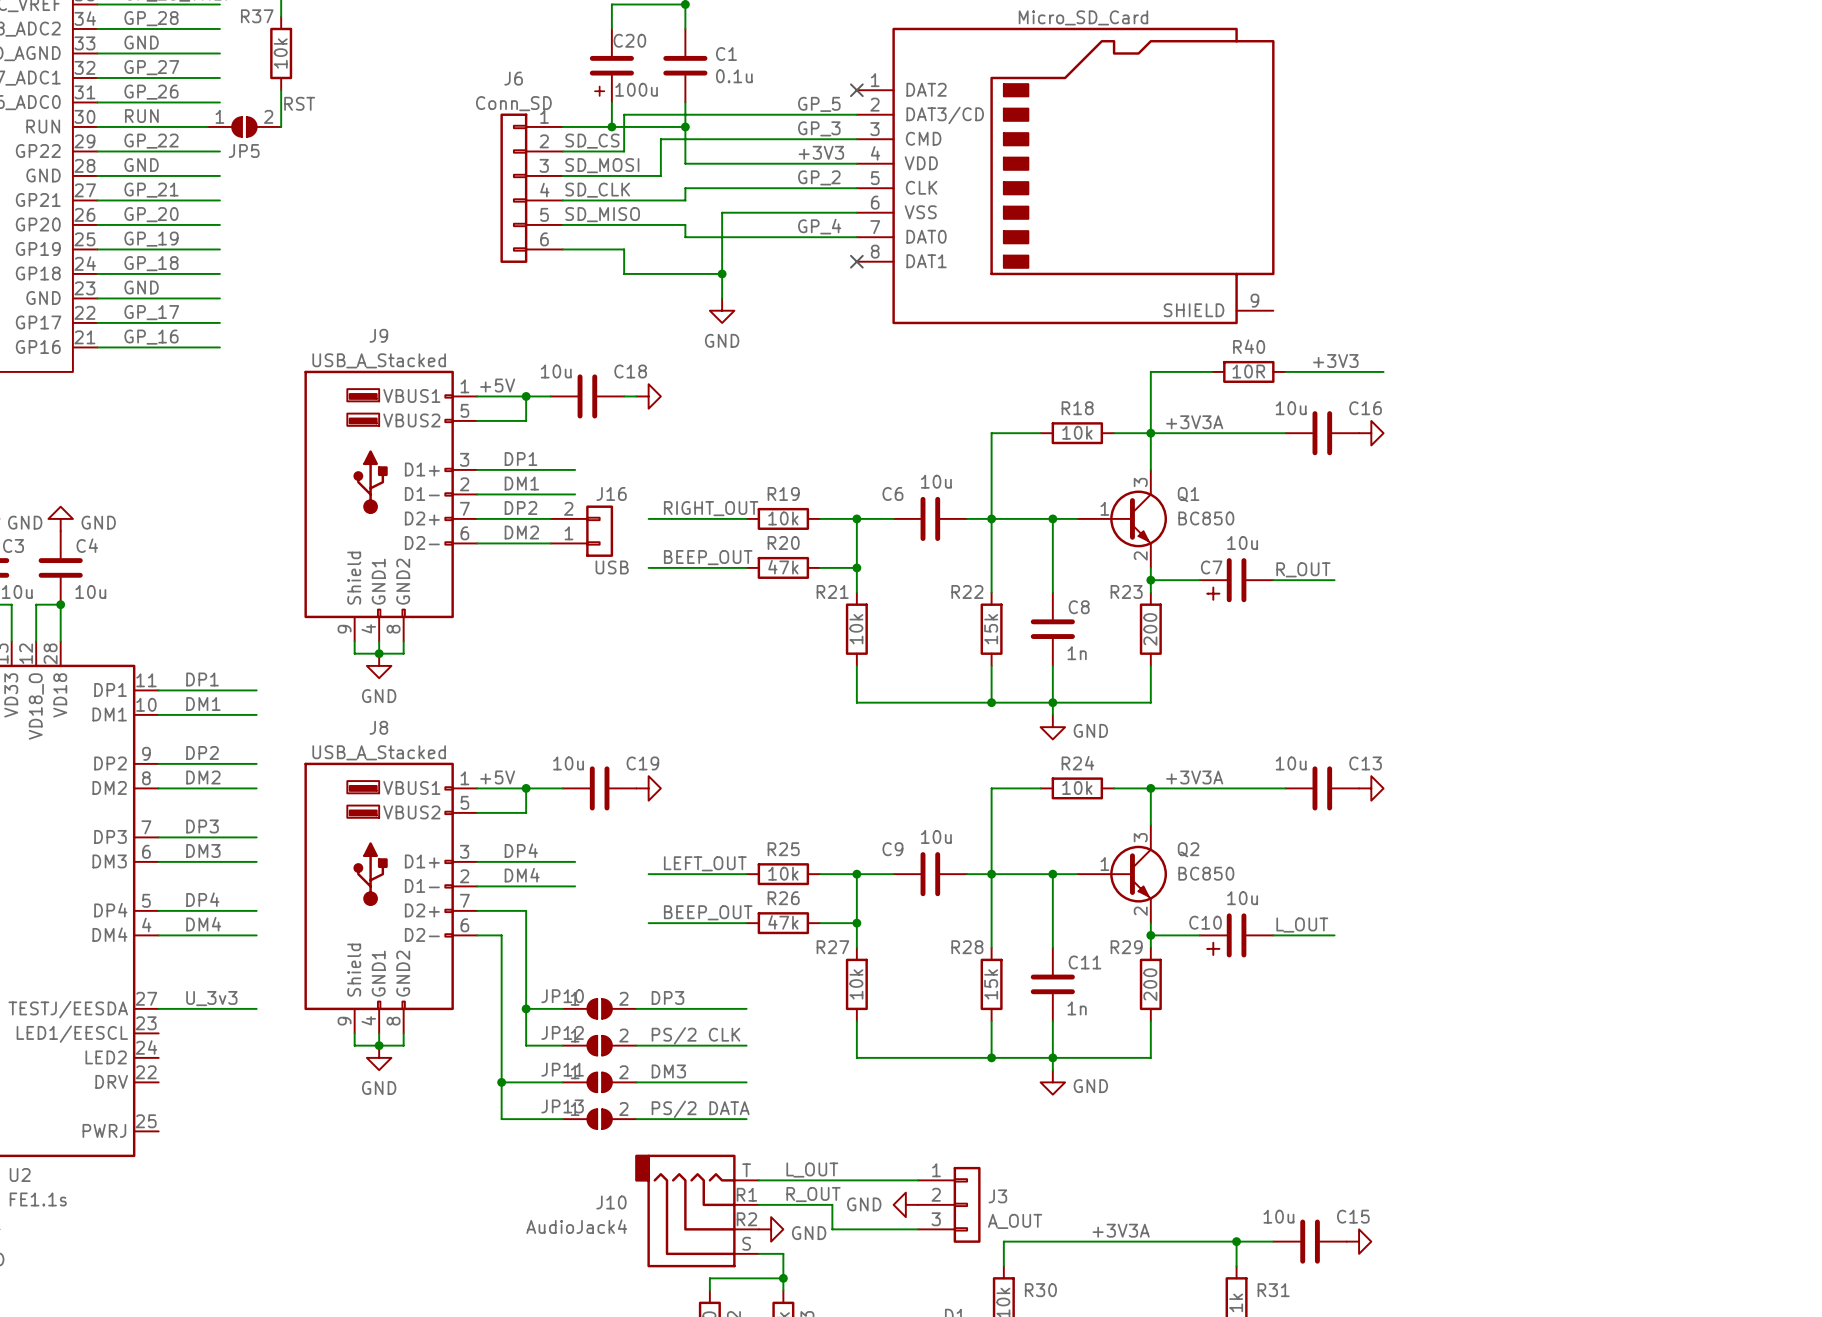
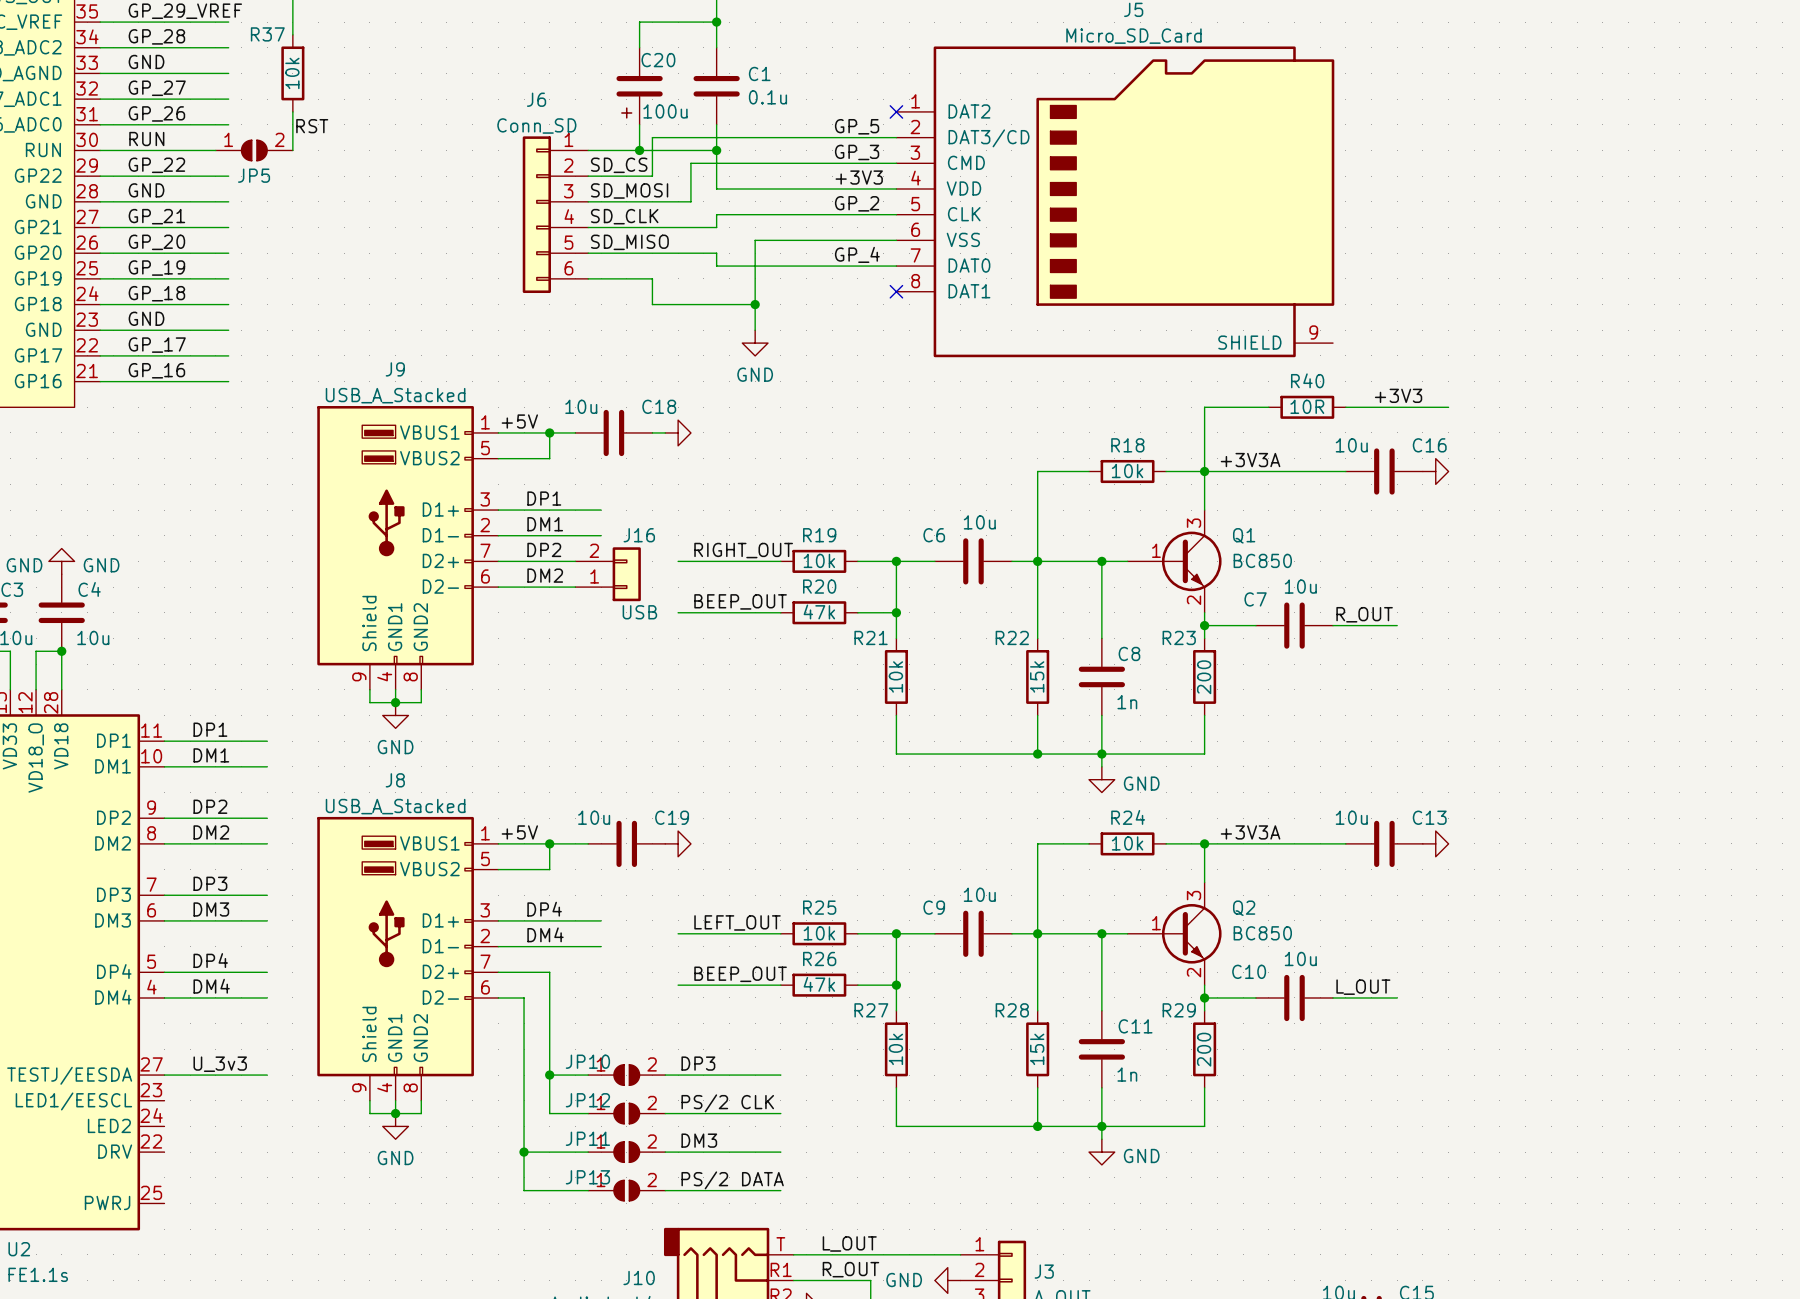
C7 symbol: [1199, 558, 1274, 603] -> [1255, 602, 1334, 649]
C10 symbol: [1199, 913, 1274, 958] -> [1255, 974, 1334, 1022]

